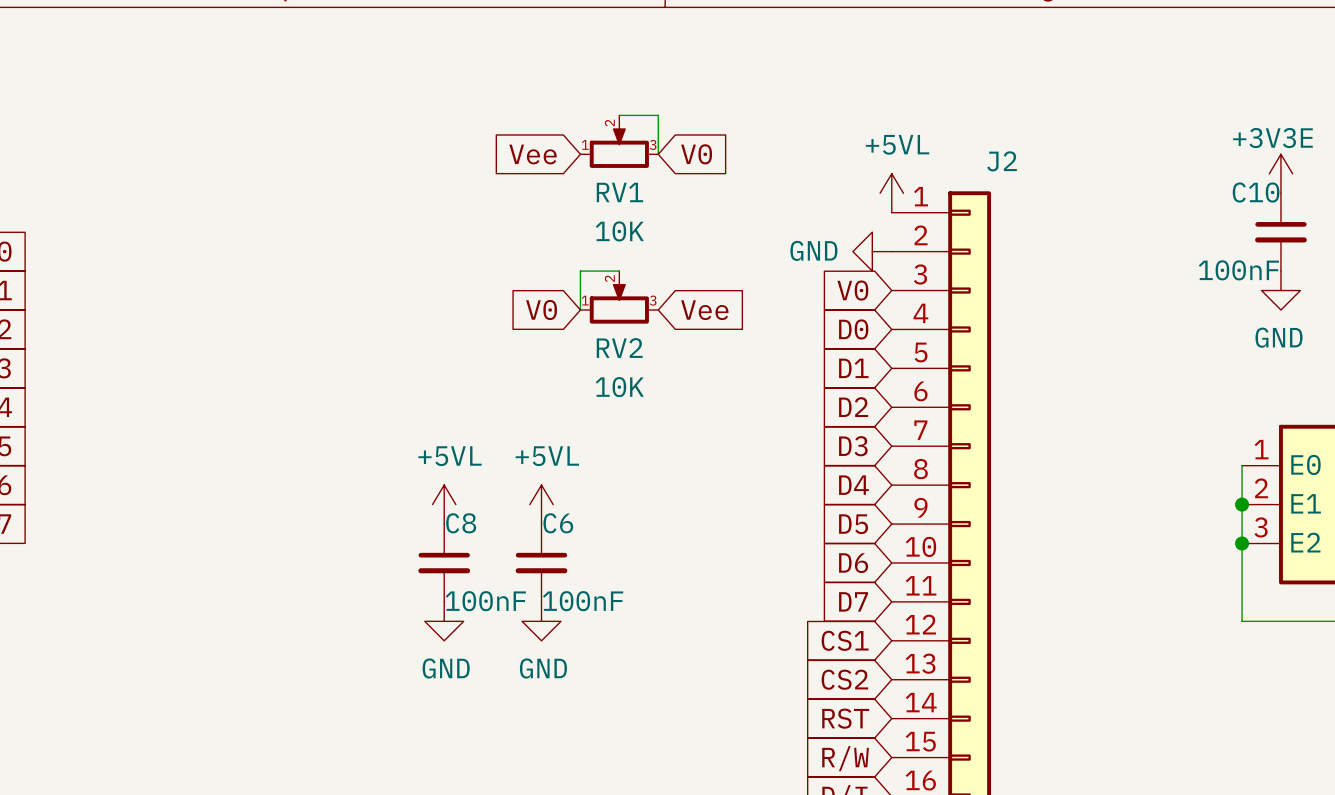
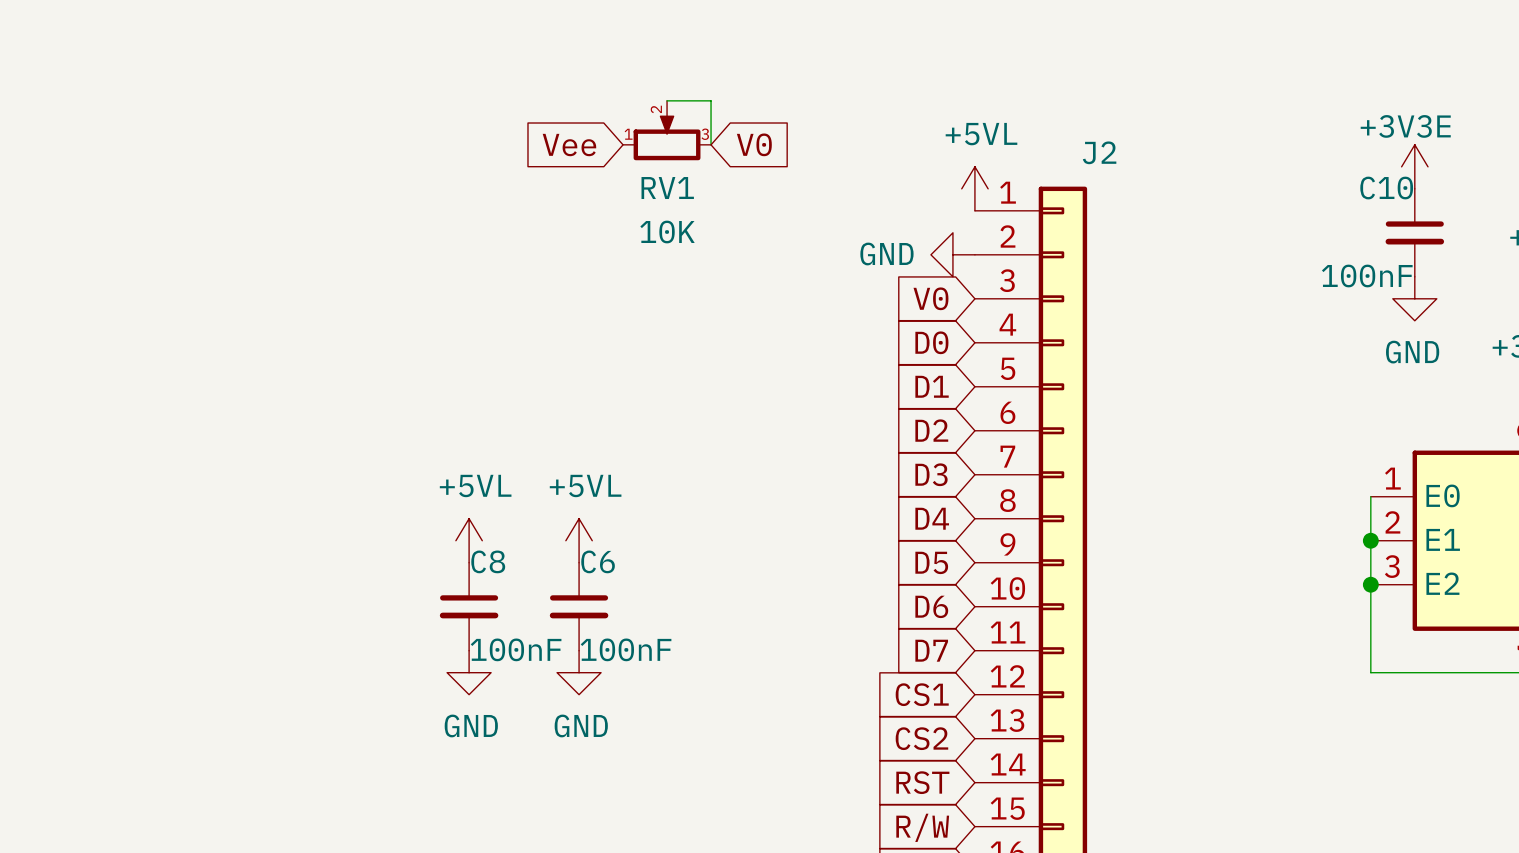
wire: (619, 271) (580, 271) (580, 309) -> none
RV2: 10K (619, 297) -> none
global label: V0 (541, 309) -> none
global label: Vee (704, 310) -> none

